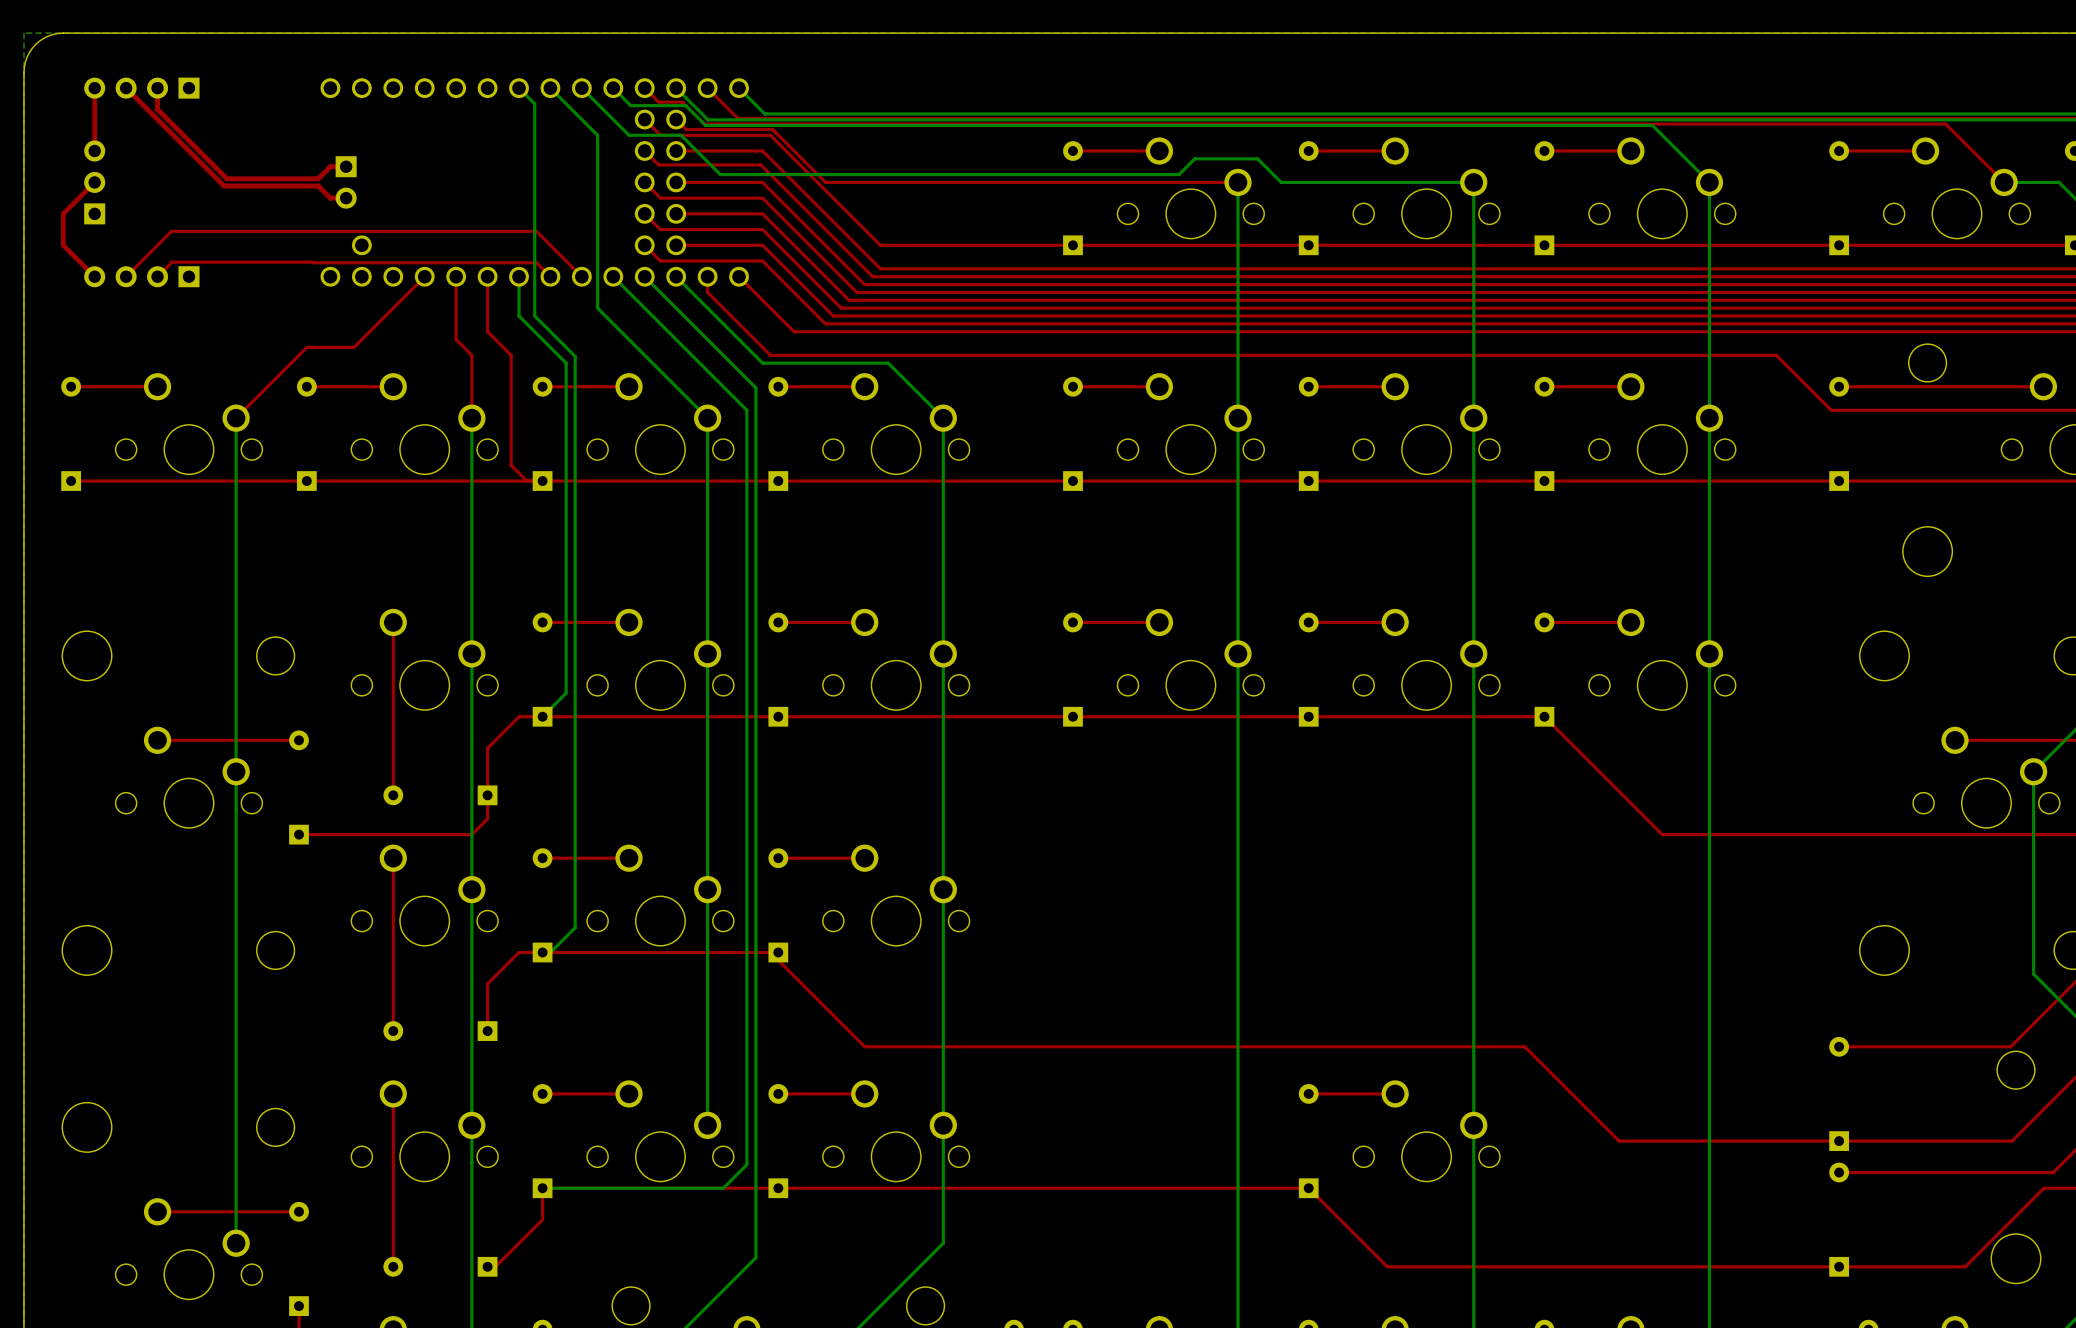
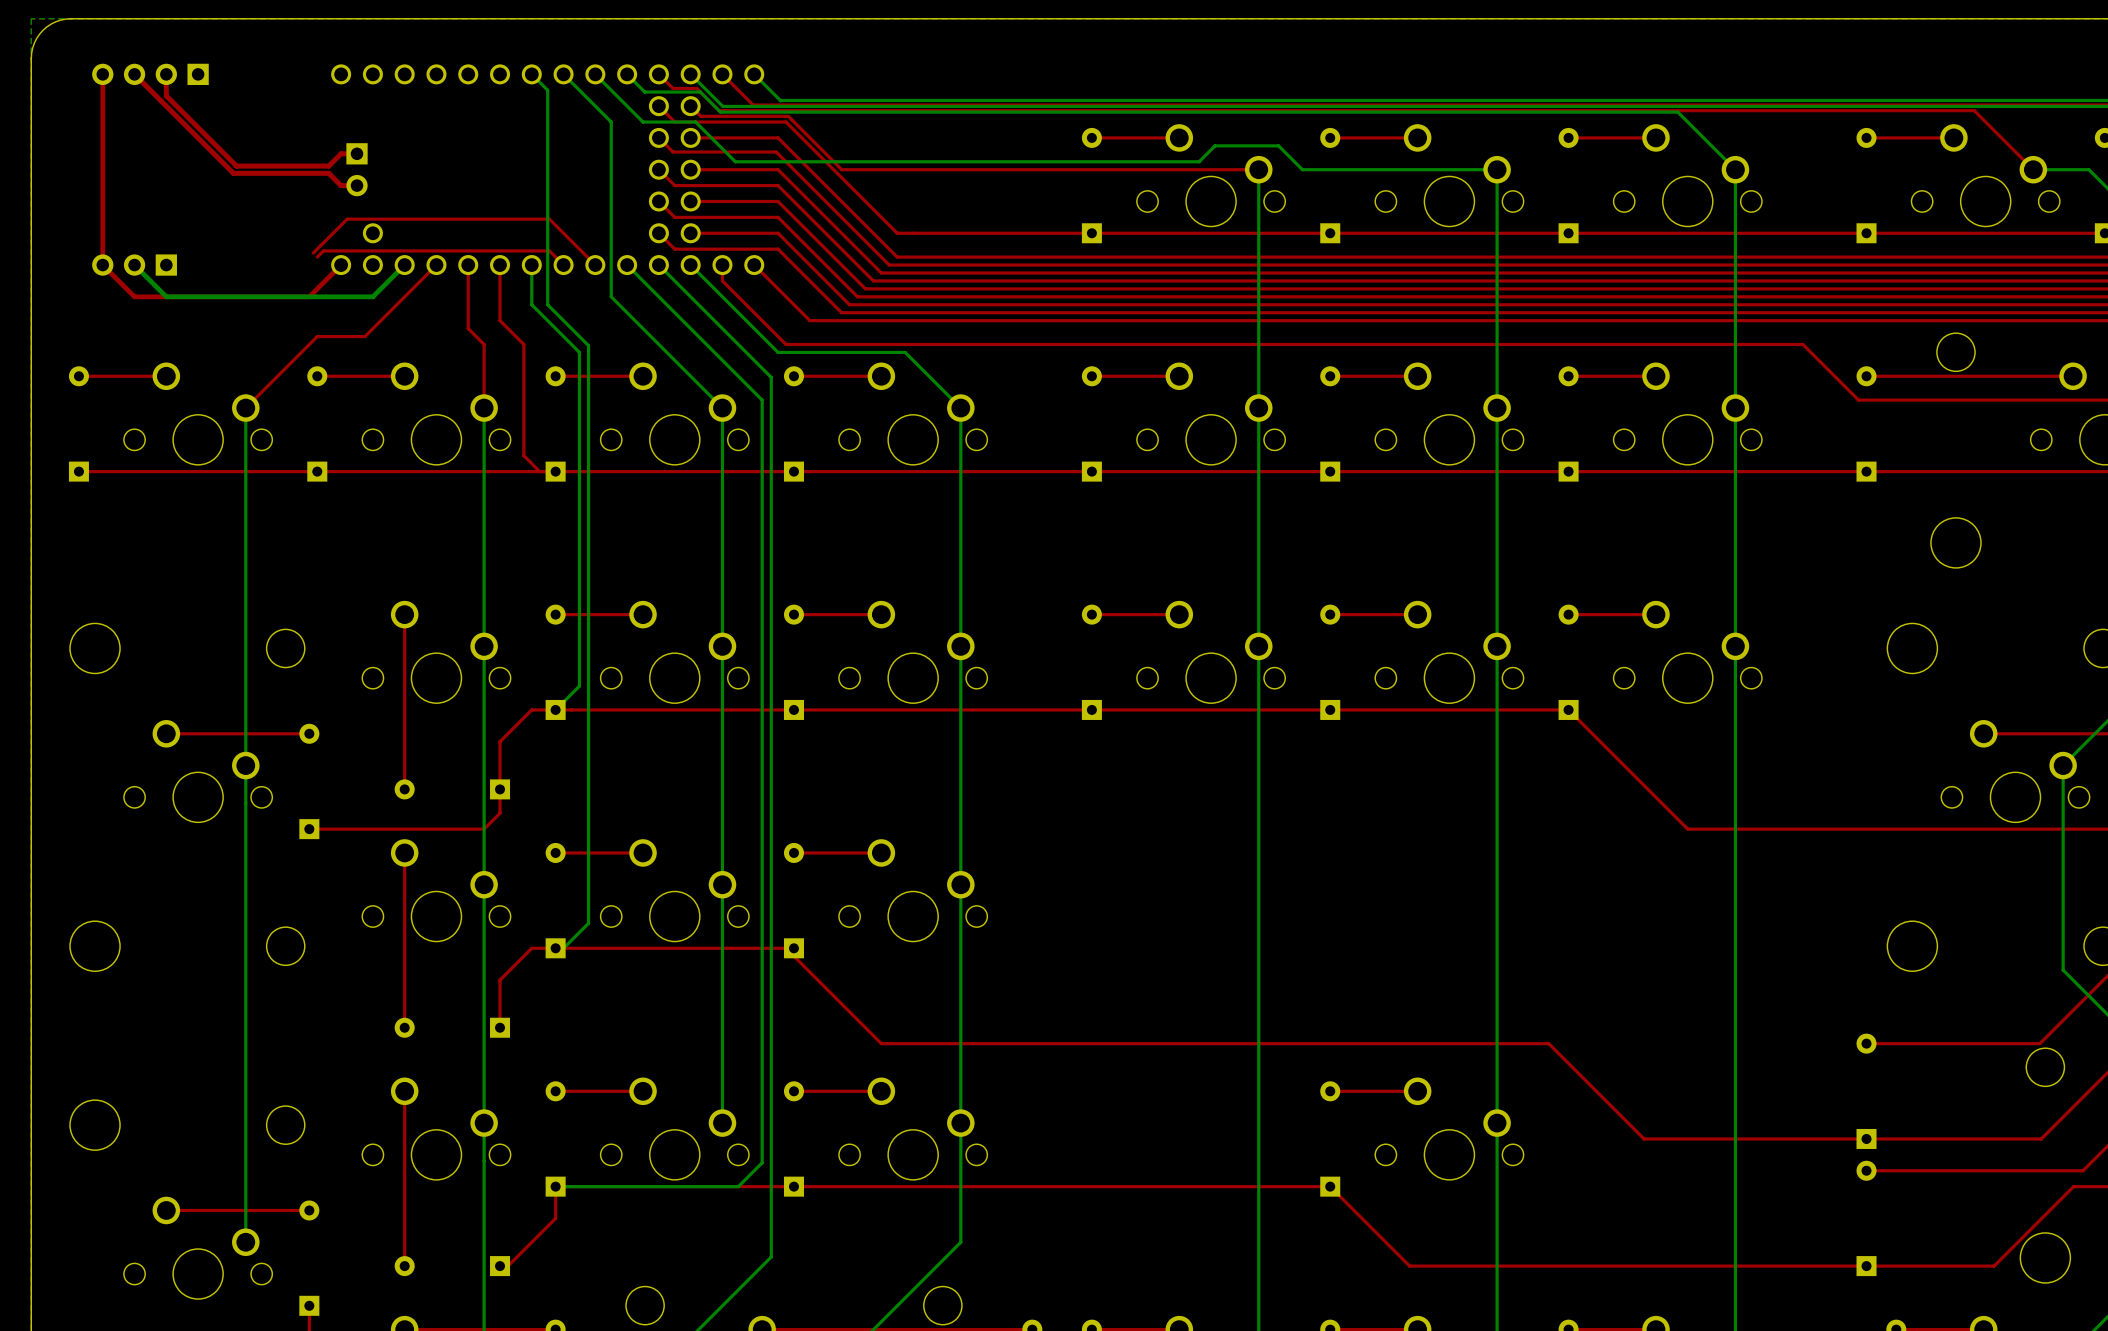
top track: none -> (102, 137) (102, 265) (134, 296) (309, 296) (341, 265)
top track: (94, 182) (63, 213) (63, 245) (94, 276) -> none
part rotation: 0° (94, 182) -> 90° counterclockwise (134, 265)
part position: (94, 182) -> (134, 265)
top track: (336, 231) (171, 231) (126, 276) -> (347, 219) (313, 253)
top track: (312, 262) (172, 262) (157, 276) -> (323, 250) (317, 257)
part: (141, 276) -> none
bottom track: none -> (404, 265) (372, 296) (166, 296) (134, 265)

